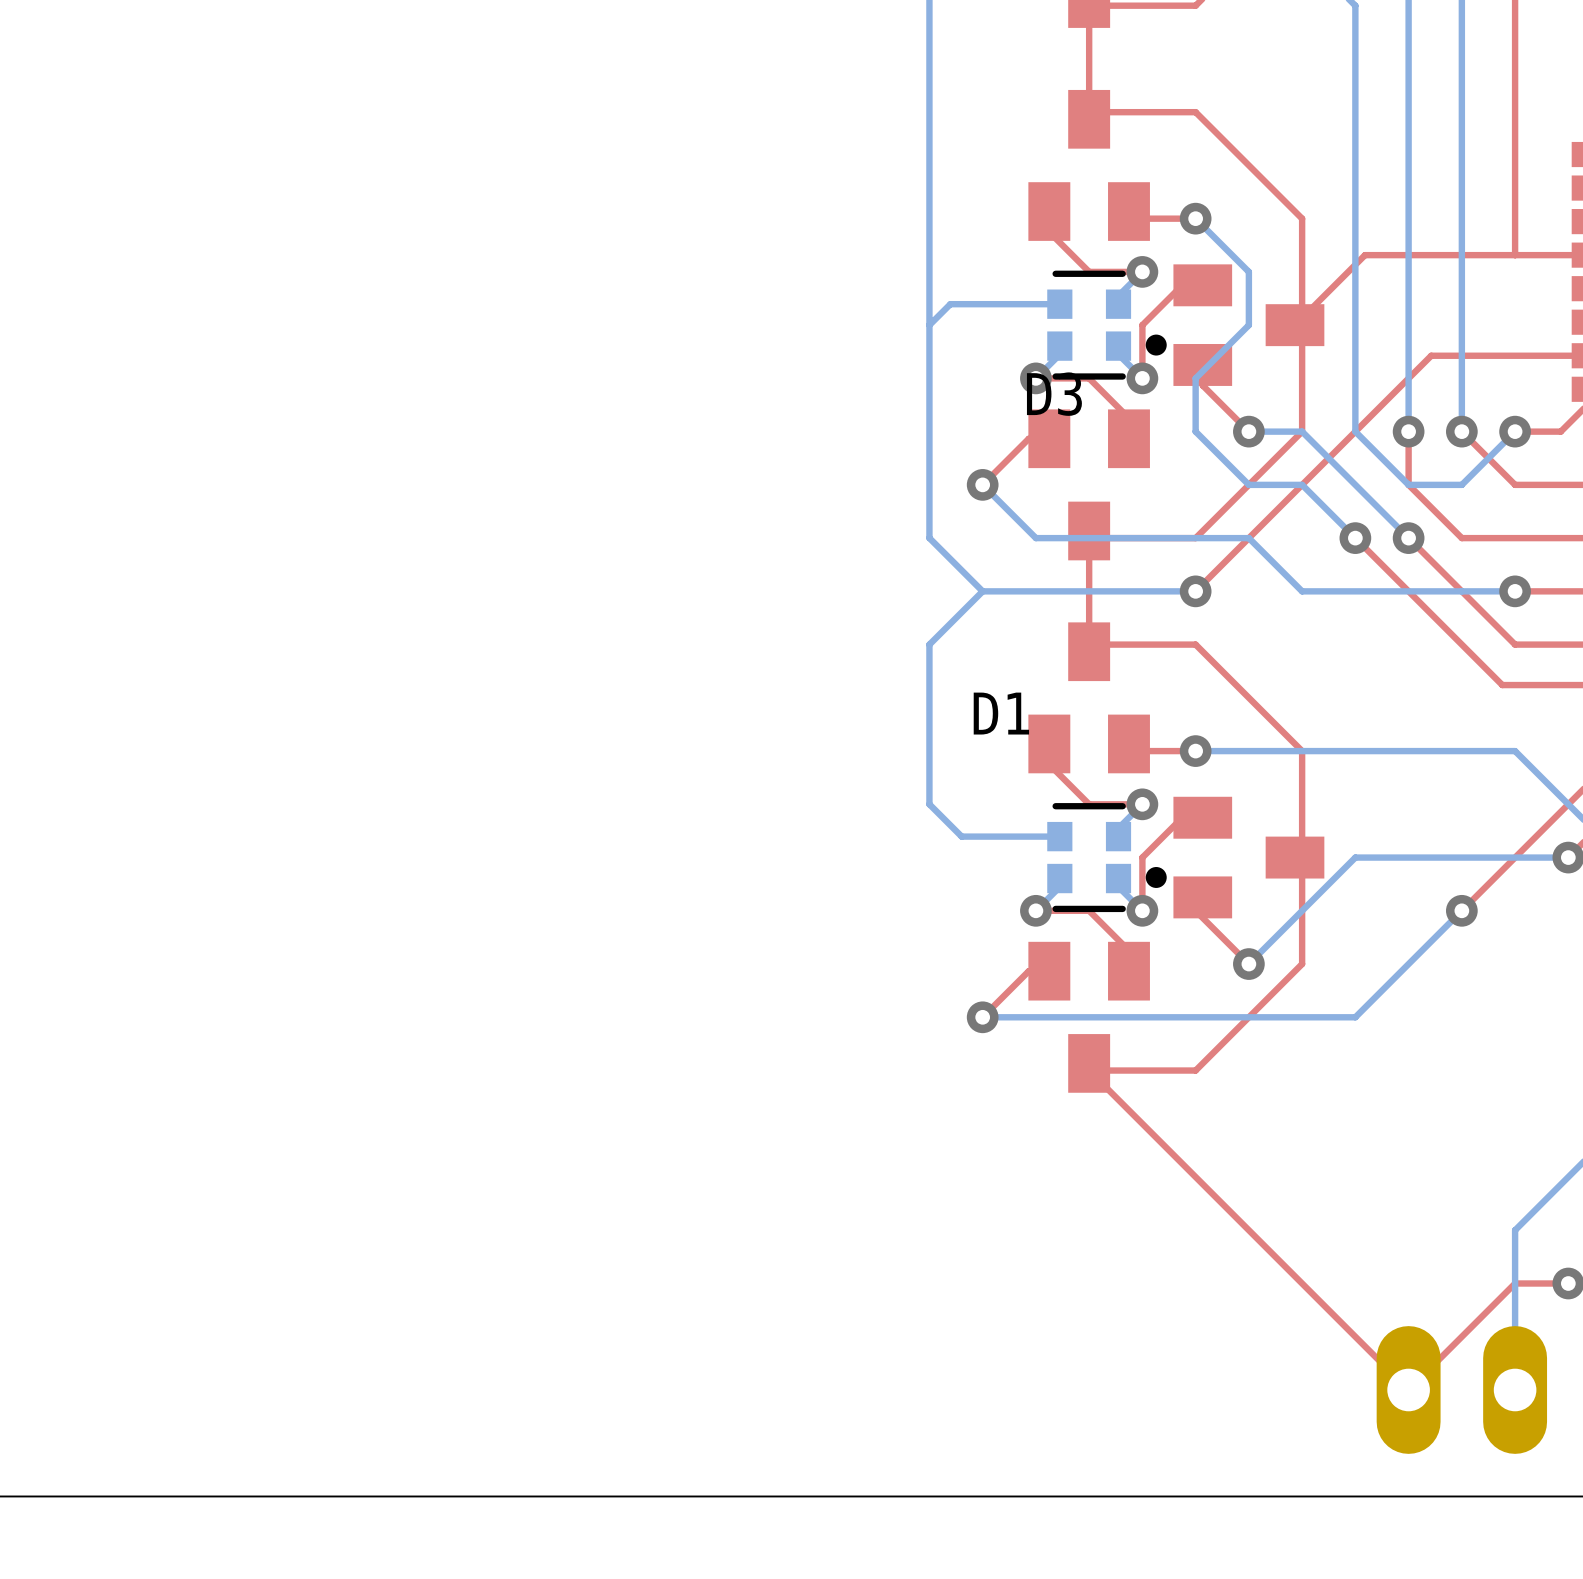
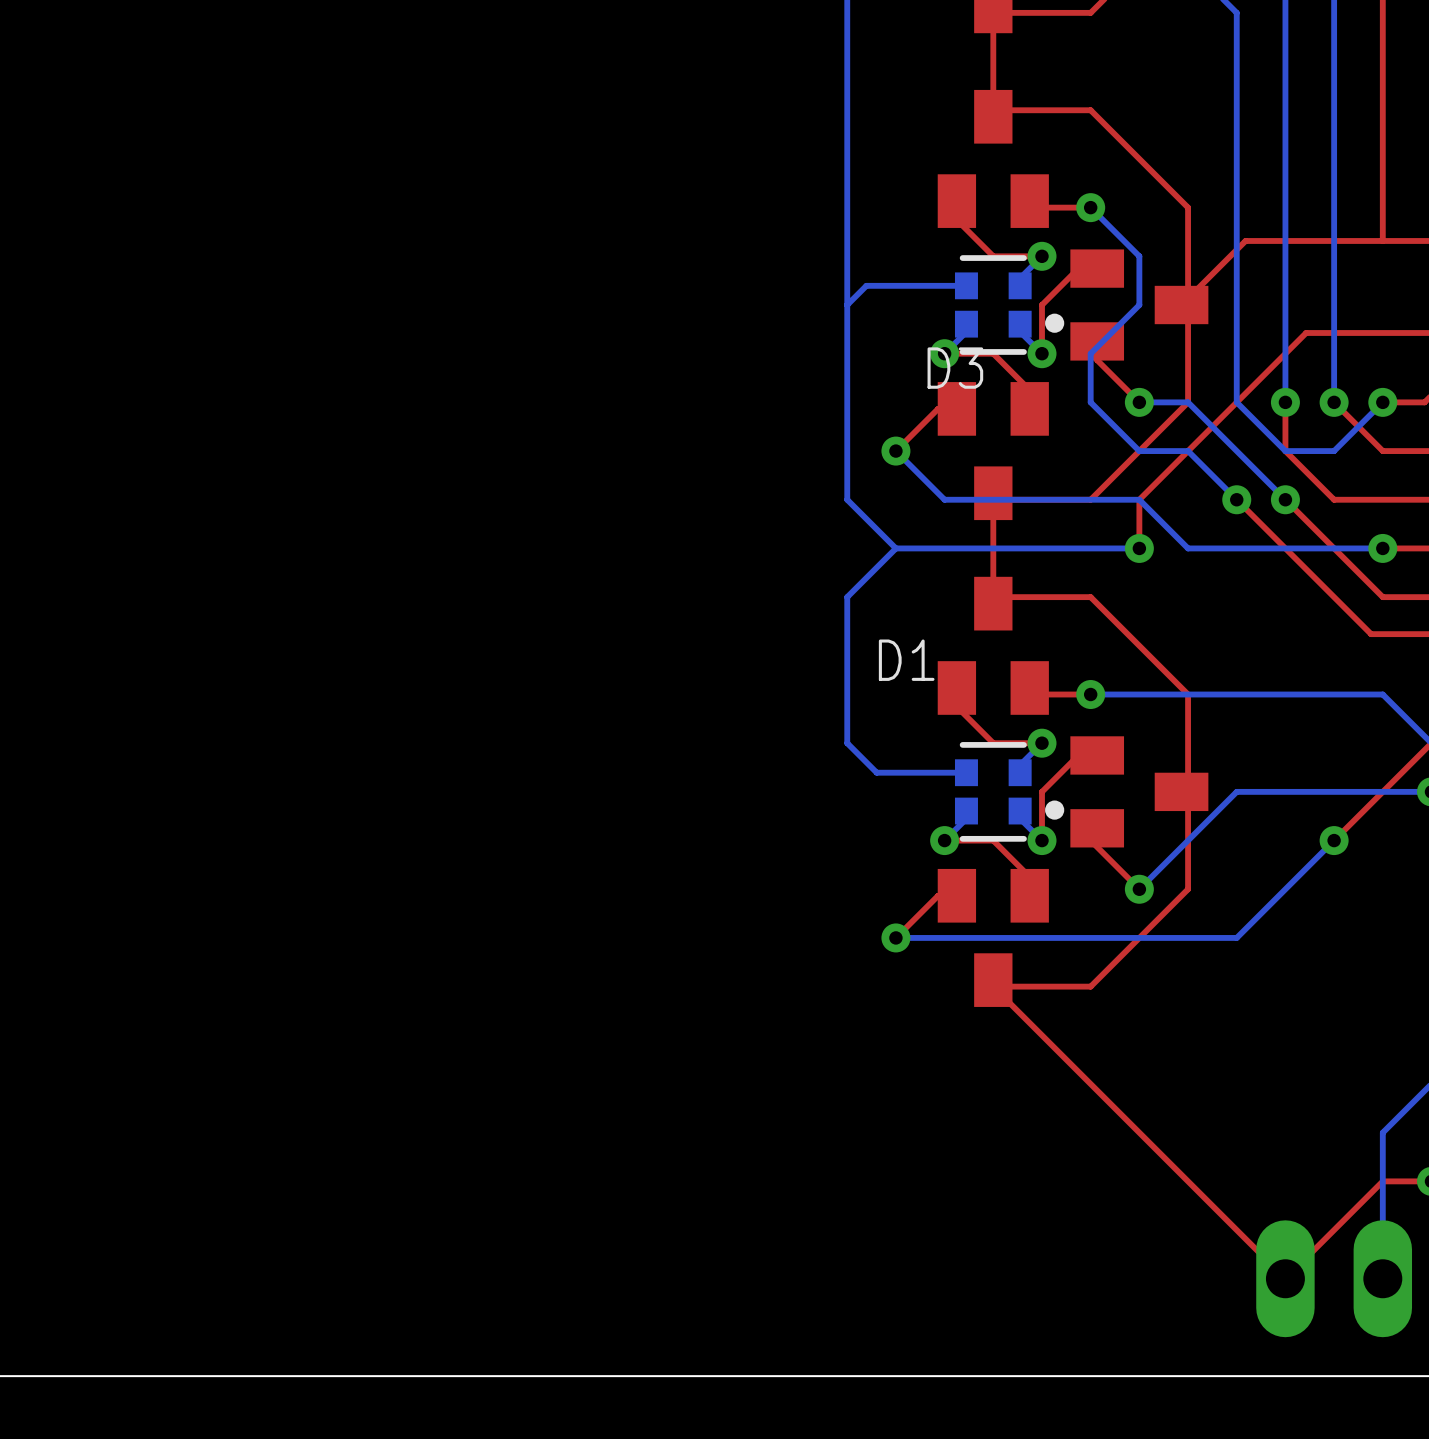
top track: (1248, 538) (1195, 591) -> (1139, 499) (1139, 548)
via position: (1195, 591) -> (1139, 548)
bottom track: none -> (1139, 548) (1090, 548)

